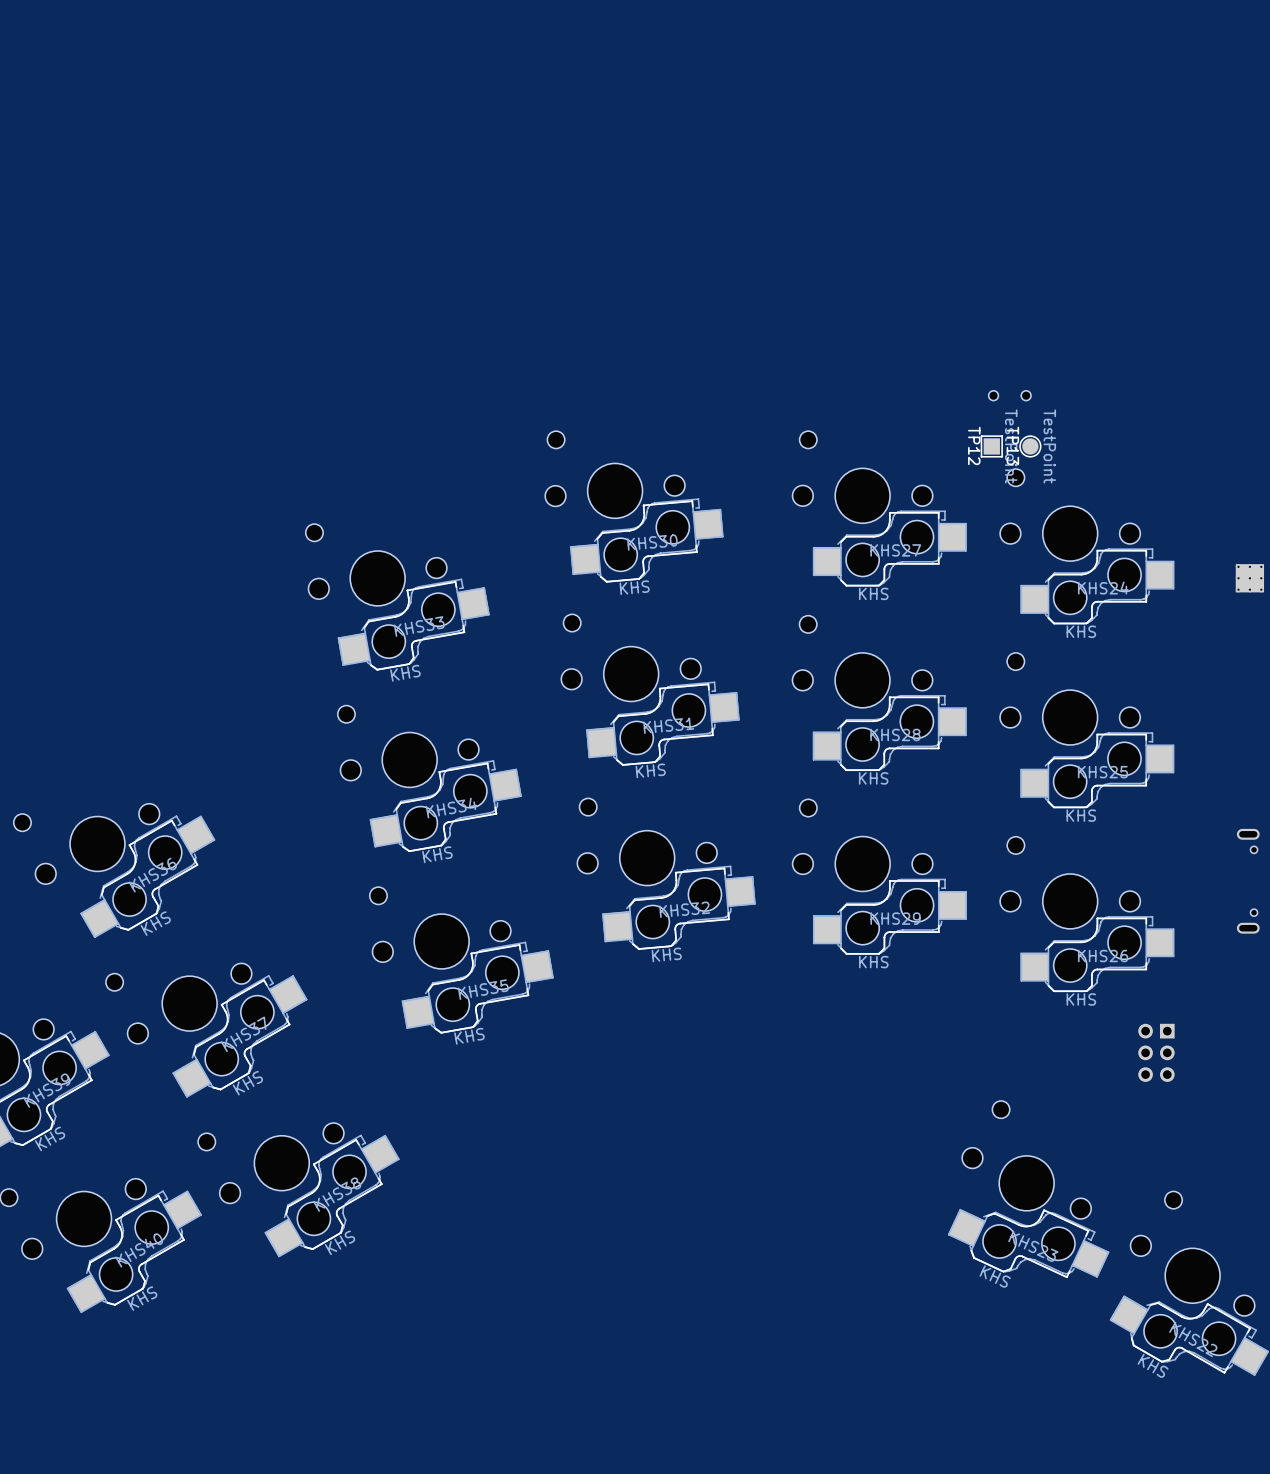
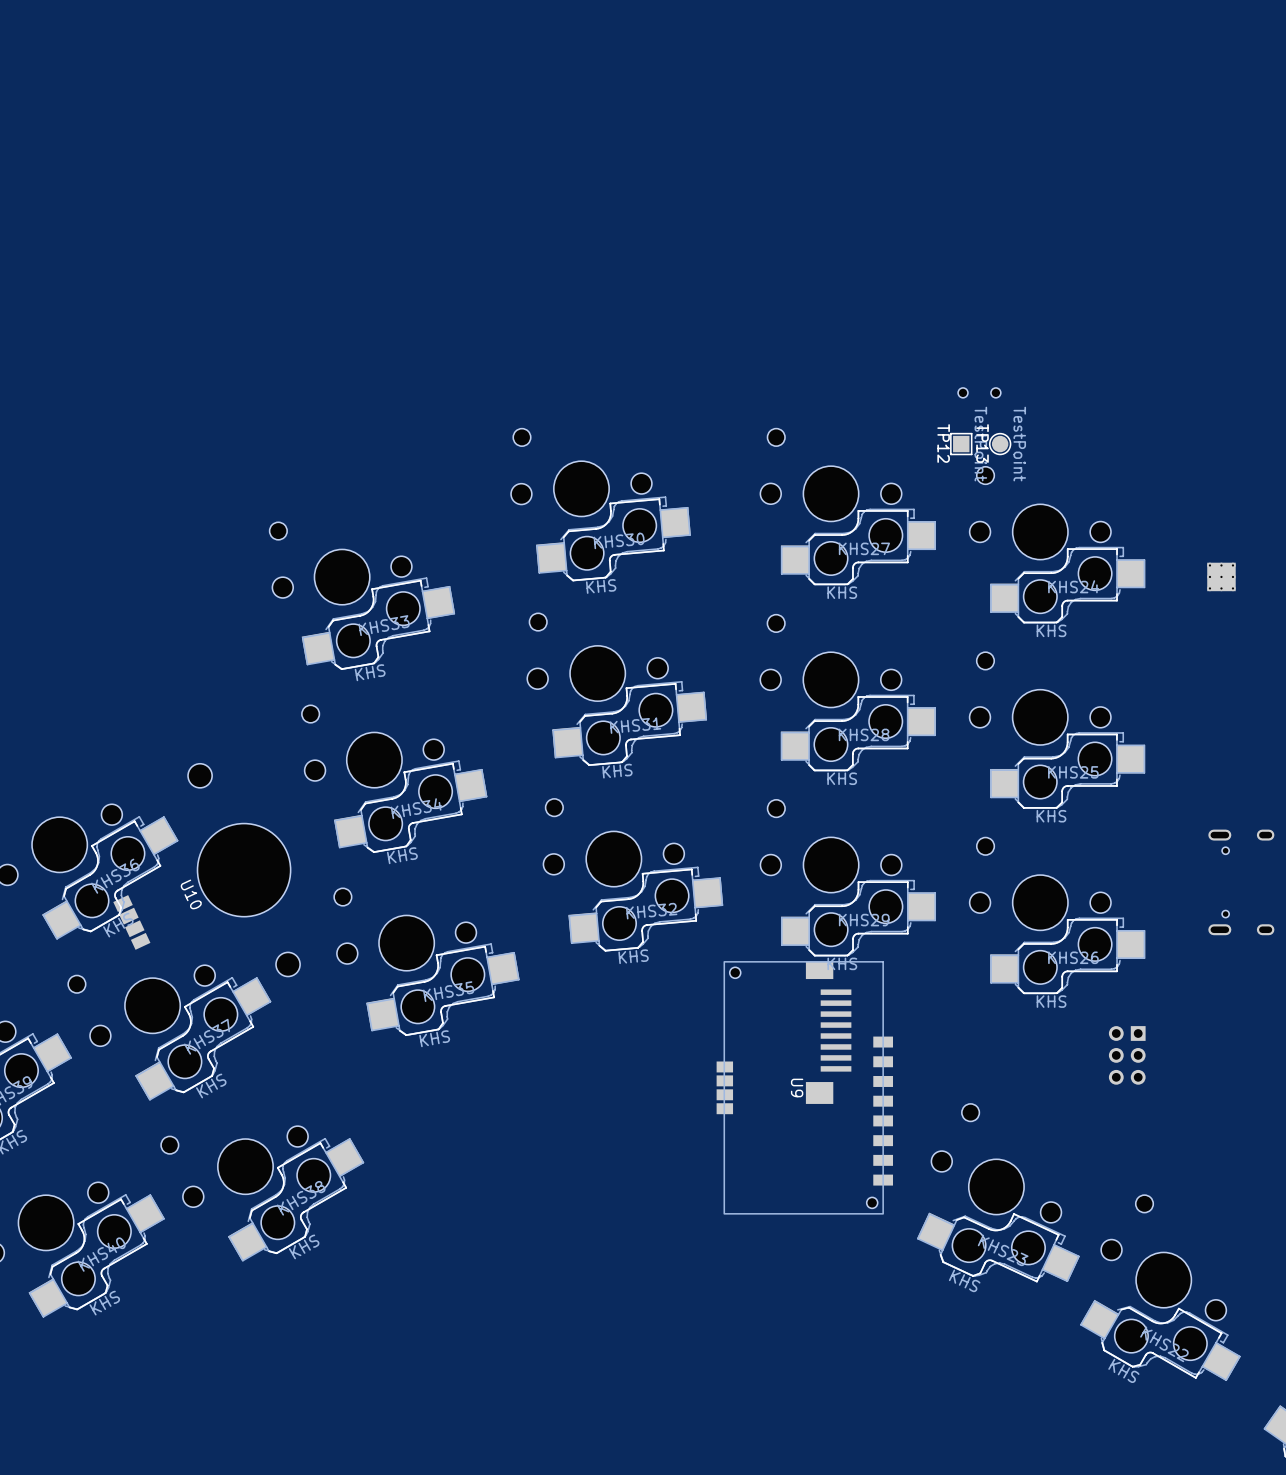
U10: none -> (206, 870)
U9: none -> (804, 1087)

